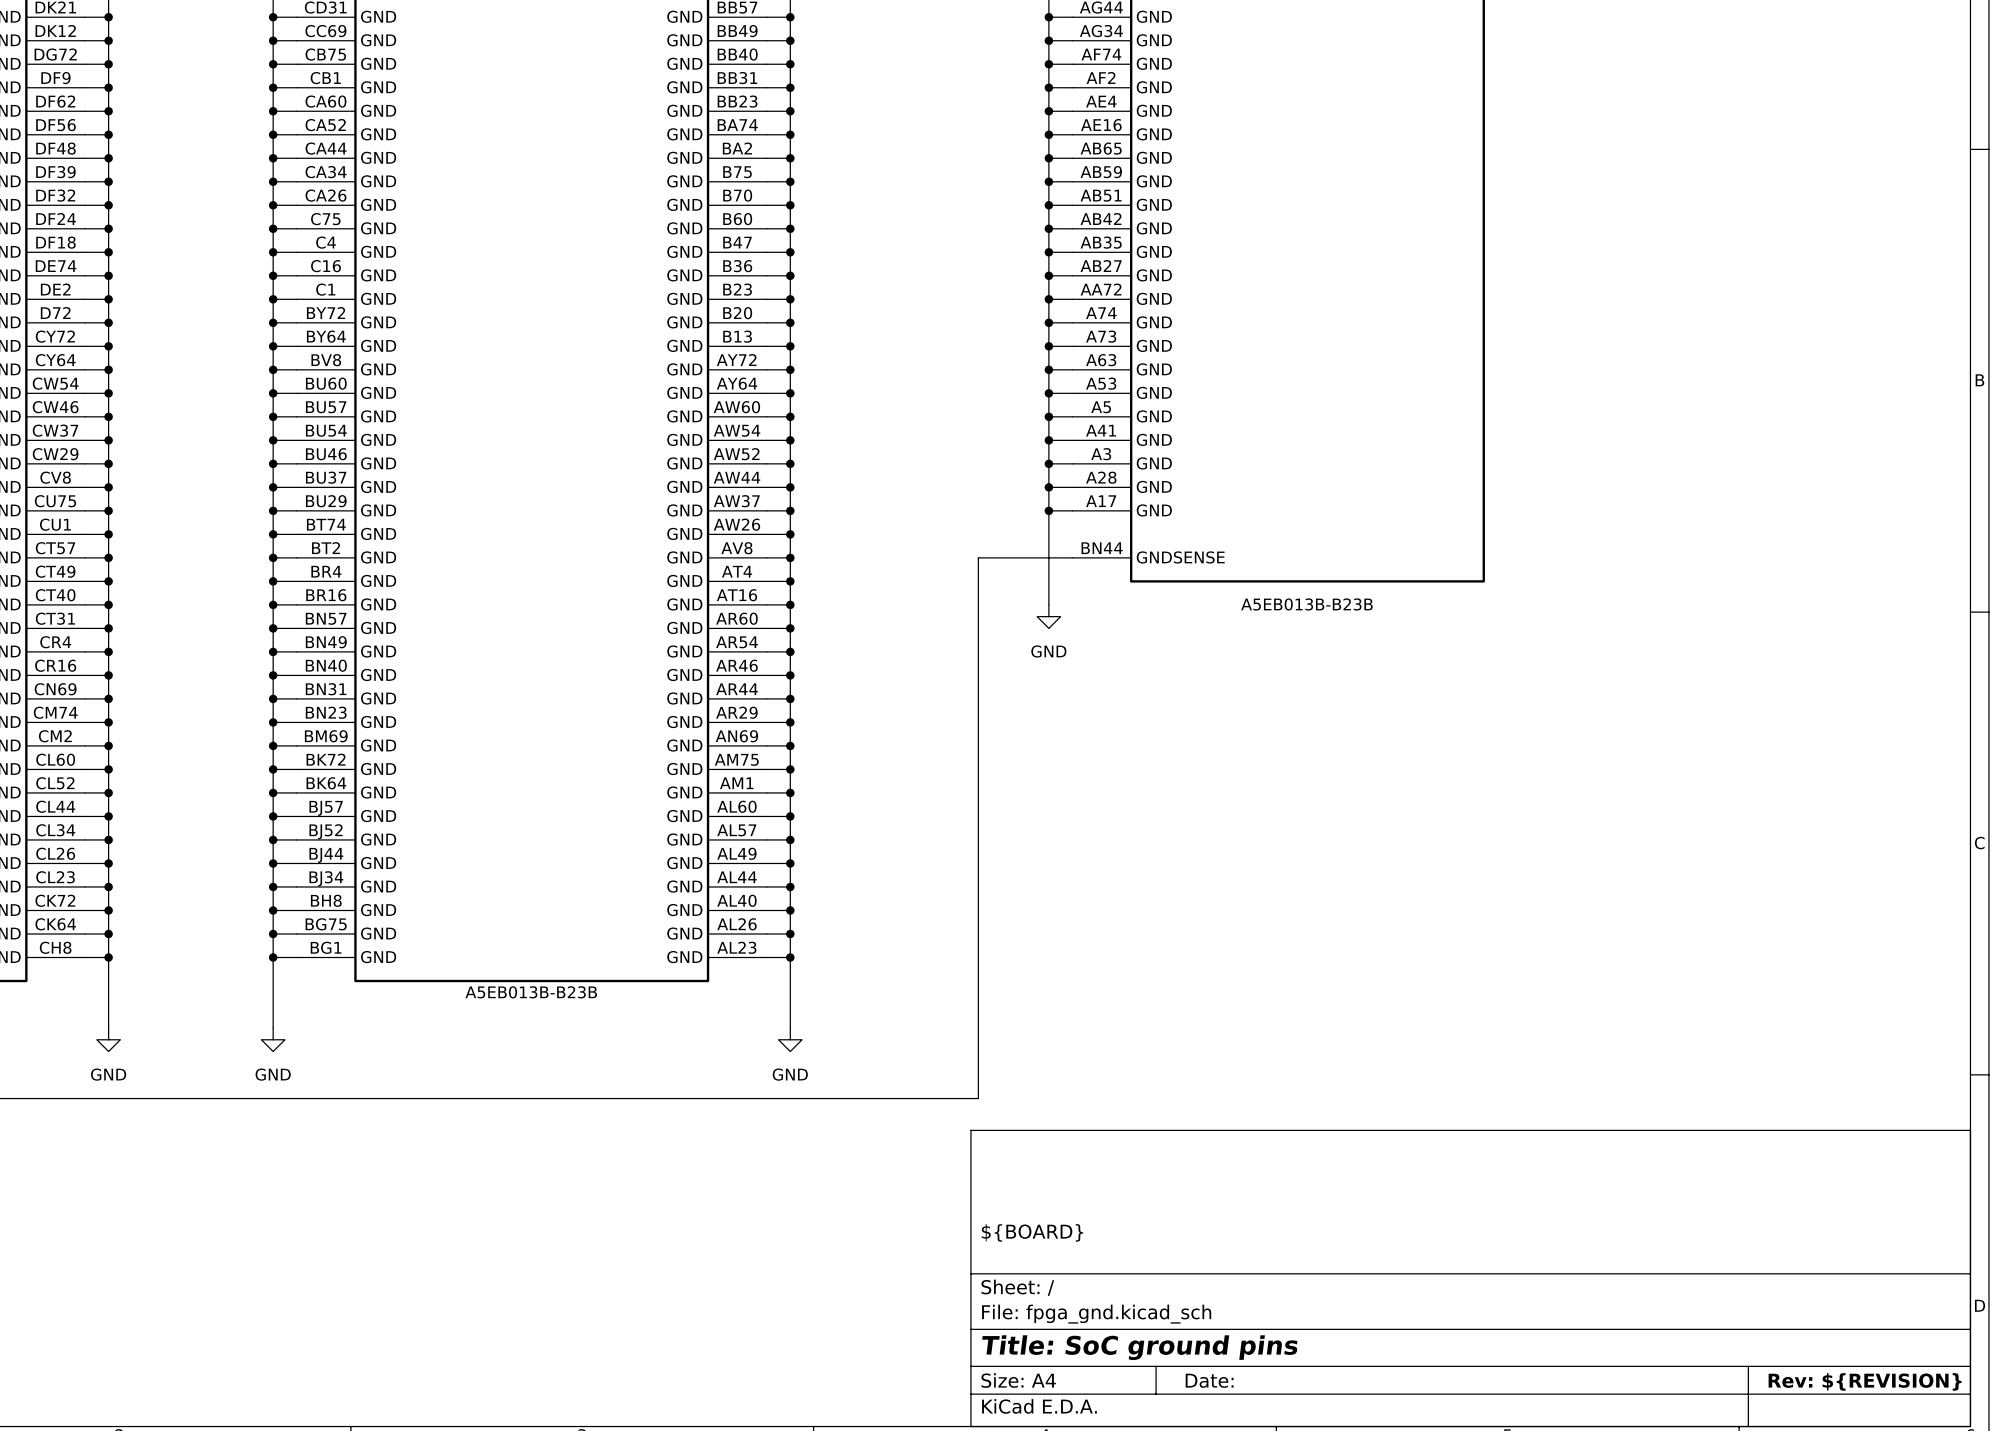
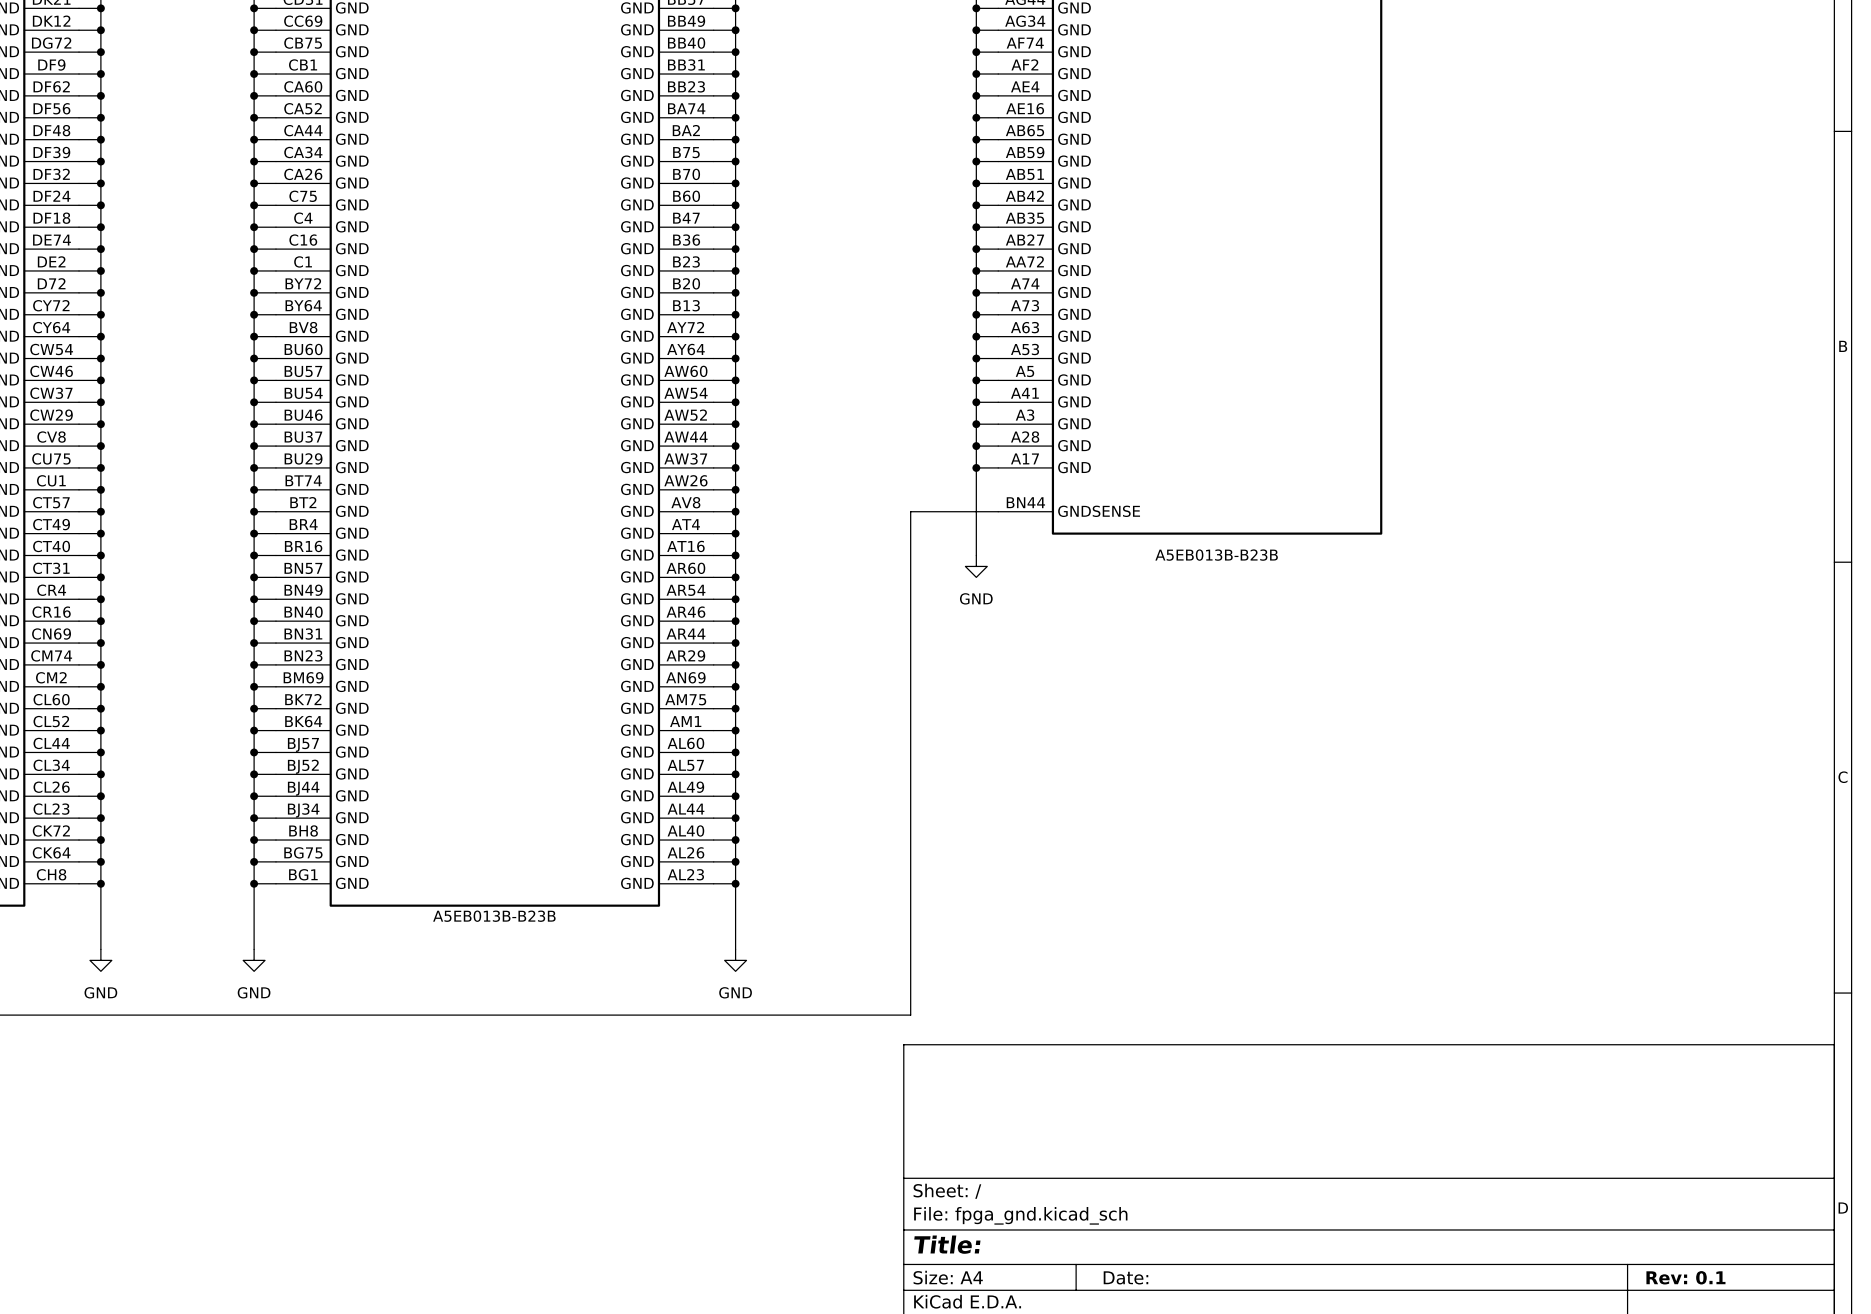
title block: ${BOARD} (1032, 1232) -> none
title block: Title: SoC ground pins (1139, 1347) -> Title: (947, 1244)
title block: Rev: ${REVISION} (1865, 1381) -> Rev: 0.1 (1685, 1277)

